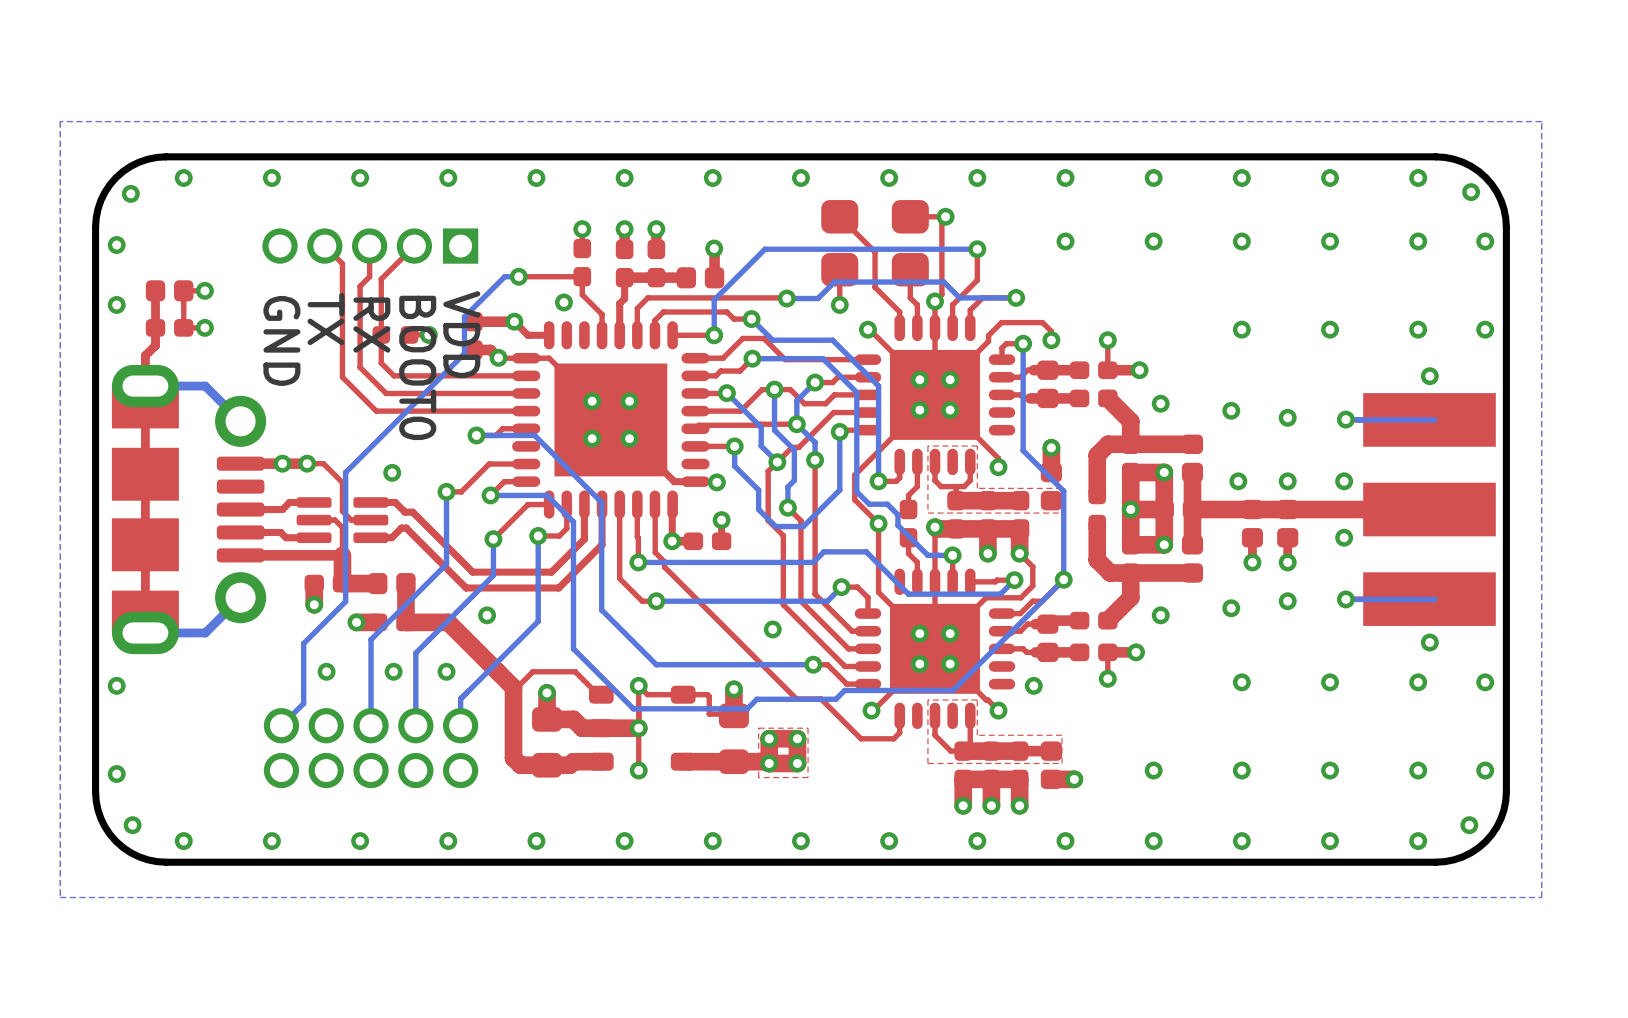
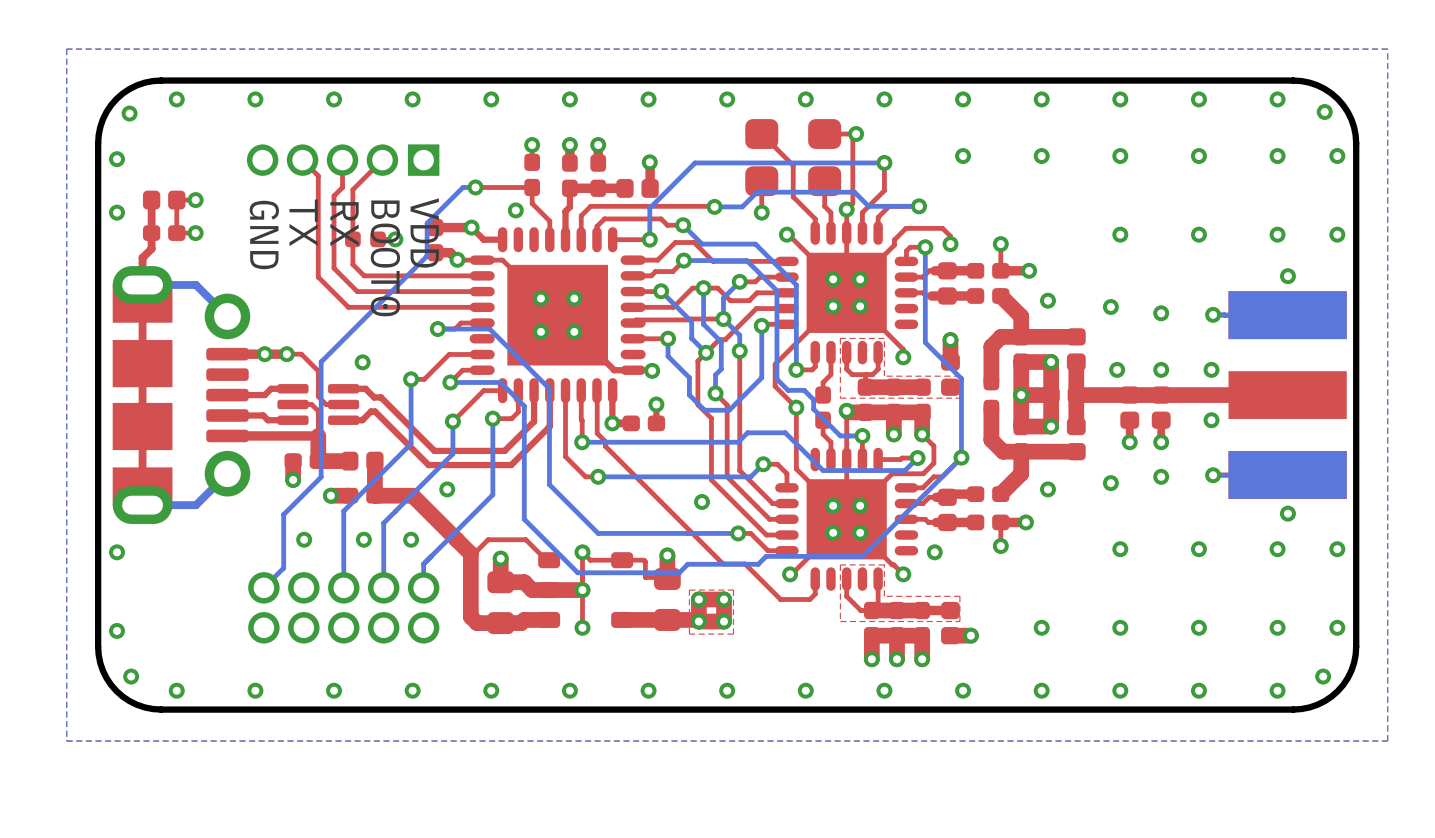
part footprint: [1363, 393, 1496, 626] -> [1228, 291, 1347, 499]

